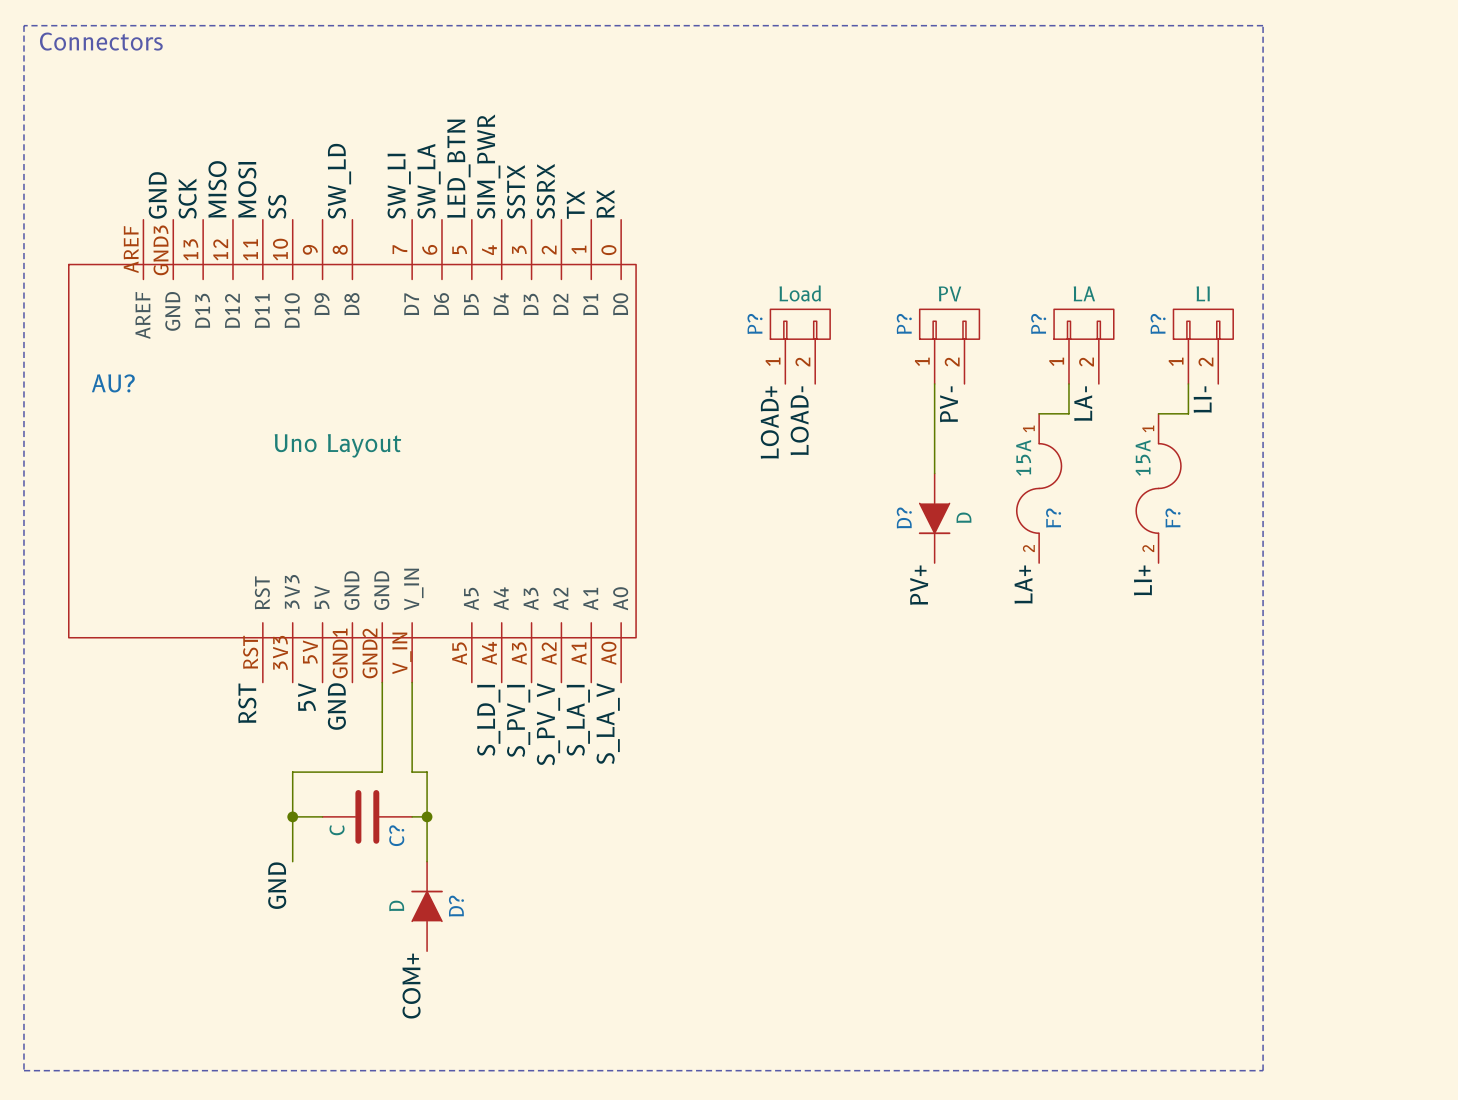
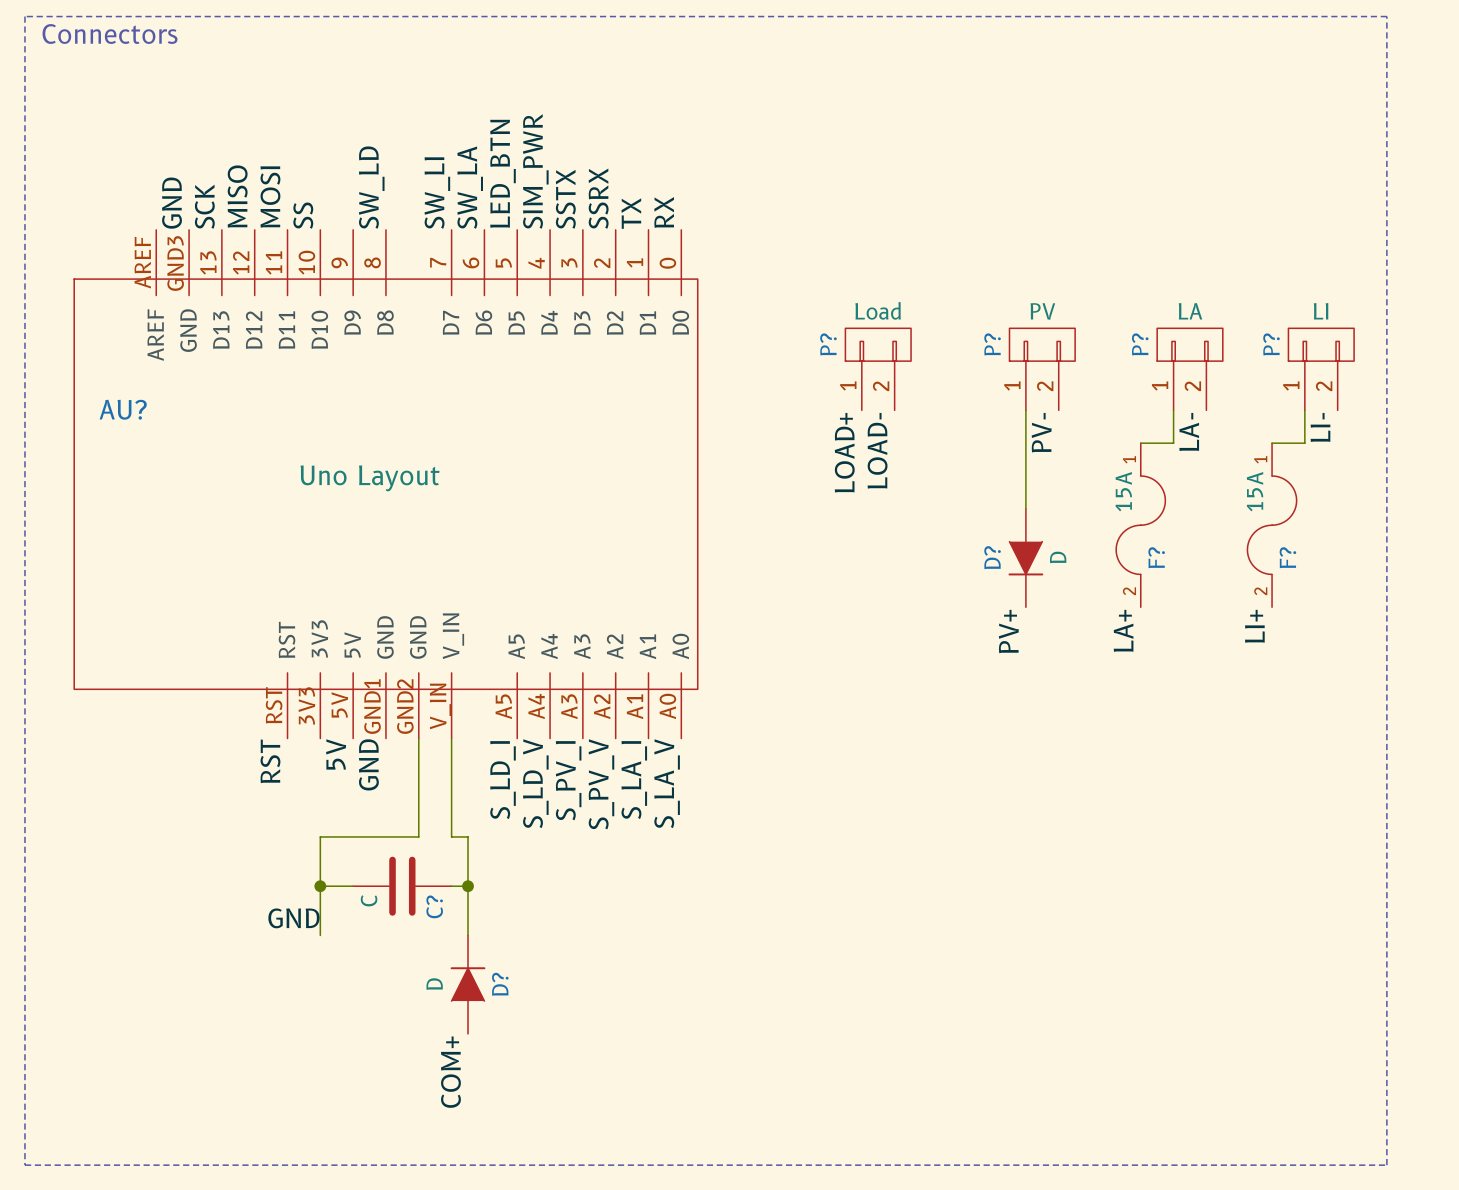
label: none -> S_LD_I (503, 780)
label: S_LD_I (488, 720) -> S_LD_V (535, 783)
label rotation: 0° (277, 885) -> 90° clockwise (293, 918)

